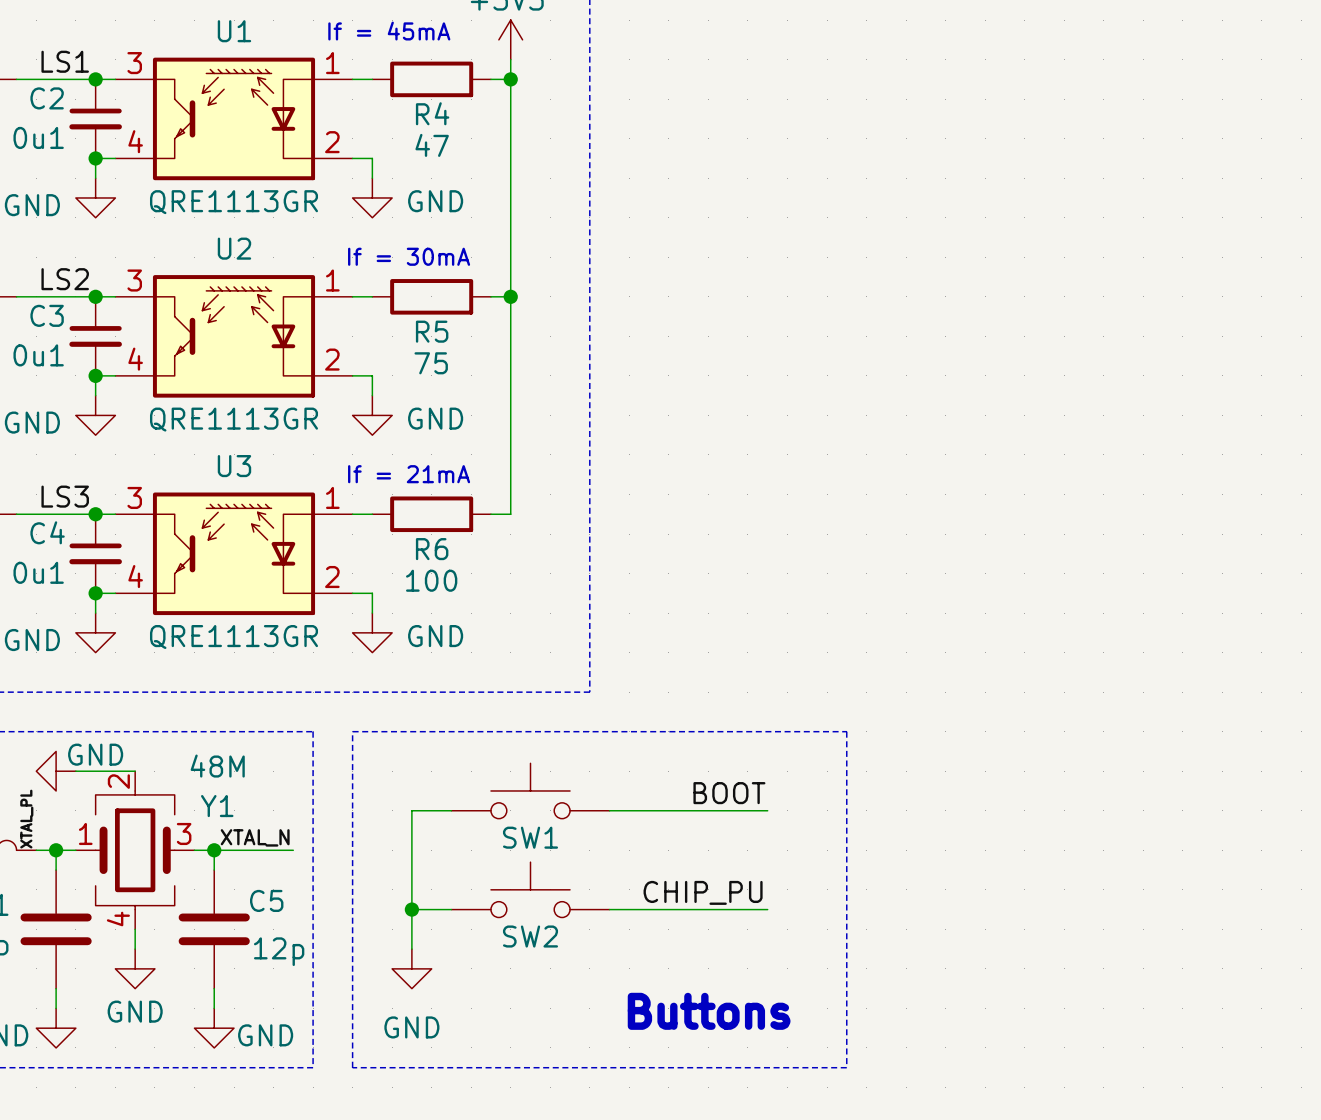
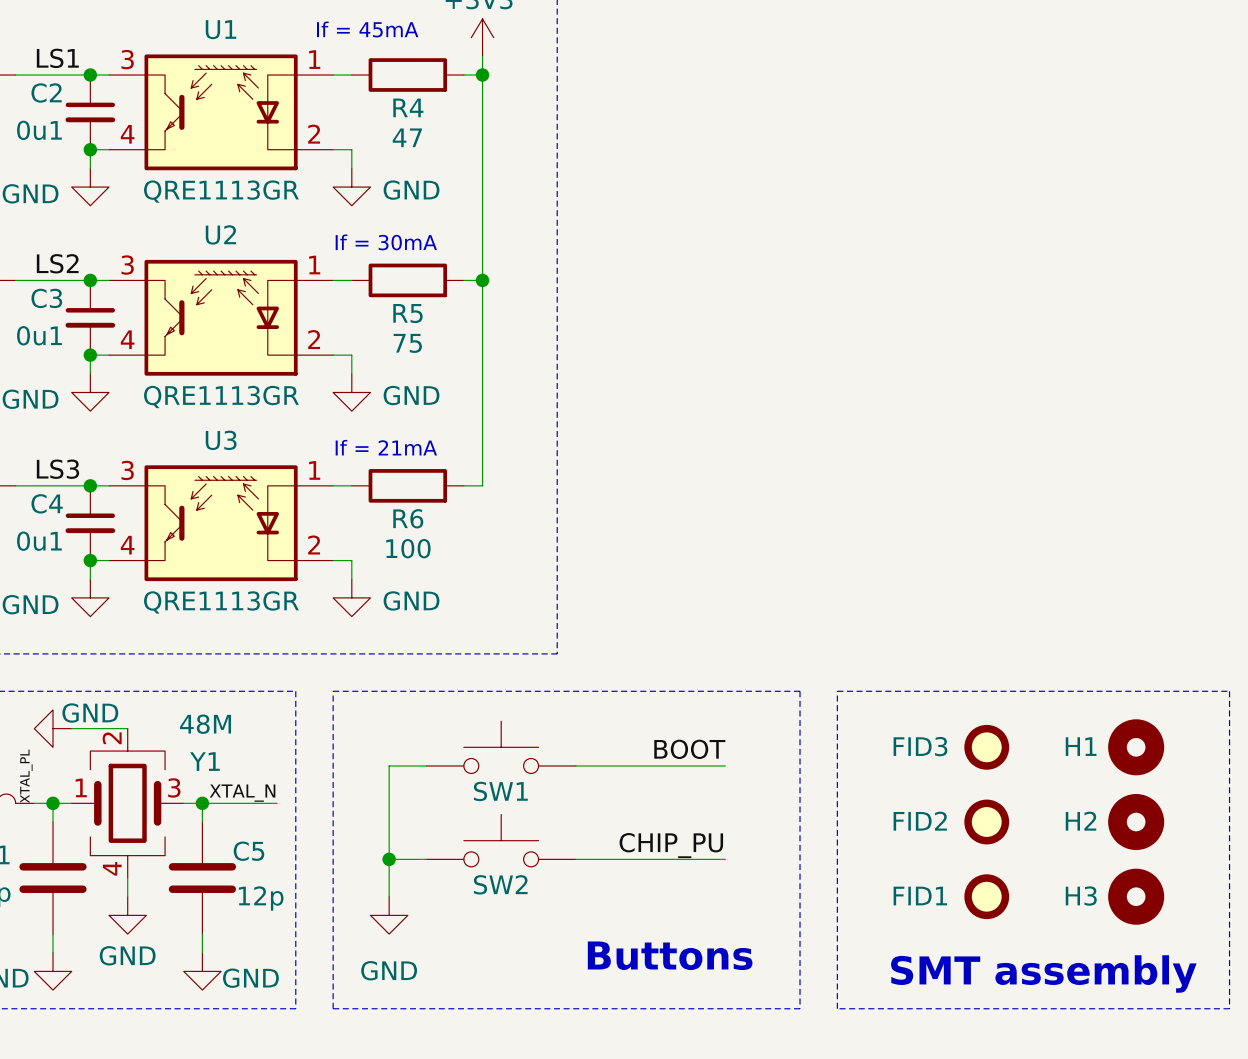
line: none -> (837, 691) (1229, 691) (1229, 1008) (837, 1008) (837, 691)
FID3: none -> (986, 747)
H1: none -> (1136, 747)
FID2: none -> (986, 822)
H2: none -> (1136, 822)
FID1: none -> (986, 896)
H3: none -> (1136, 896)
text: none -> SMT assembly (1043, 973)

